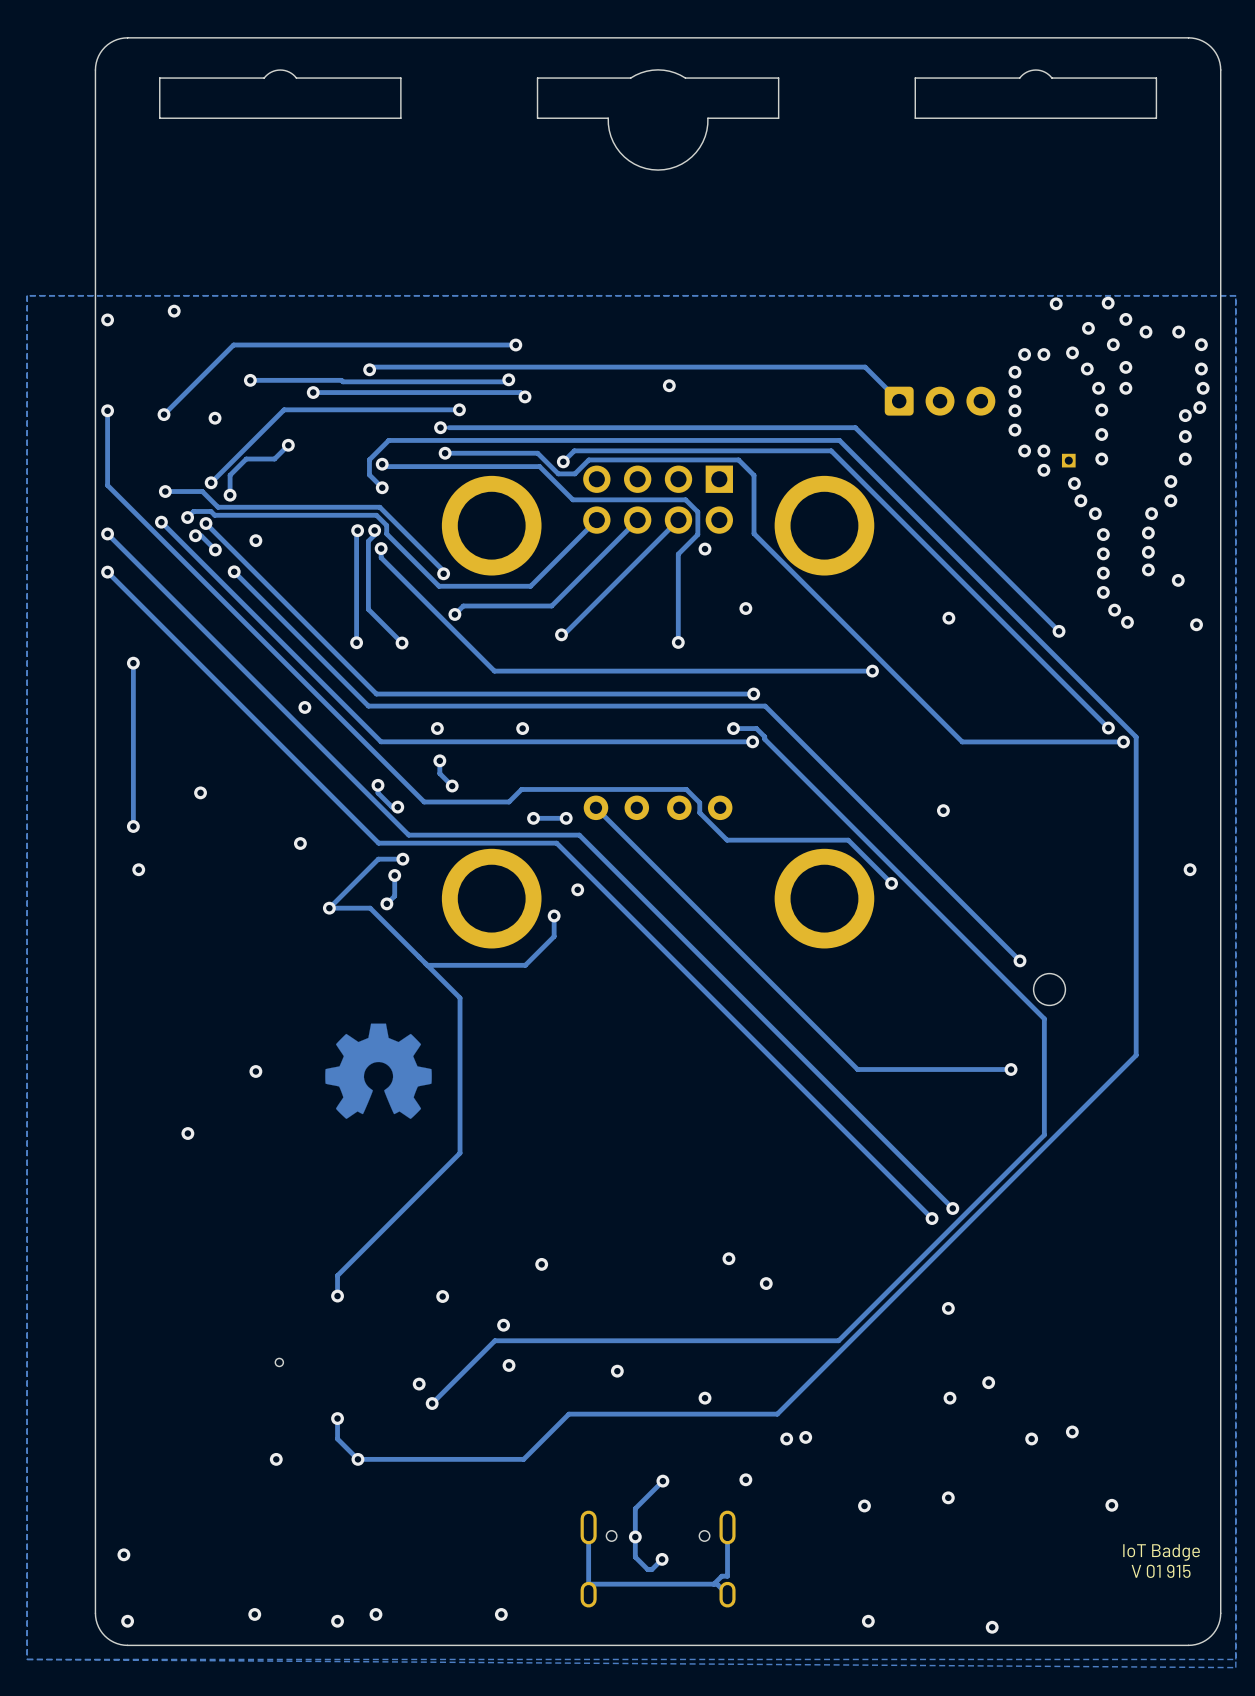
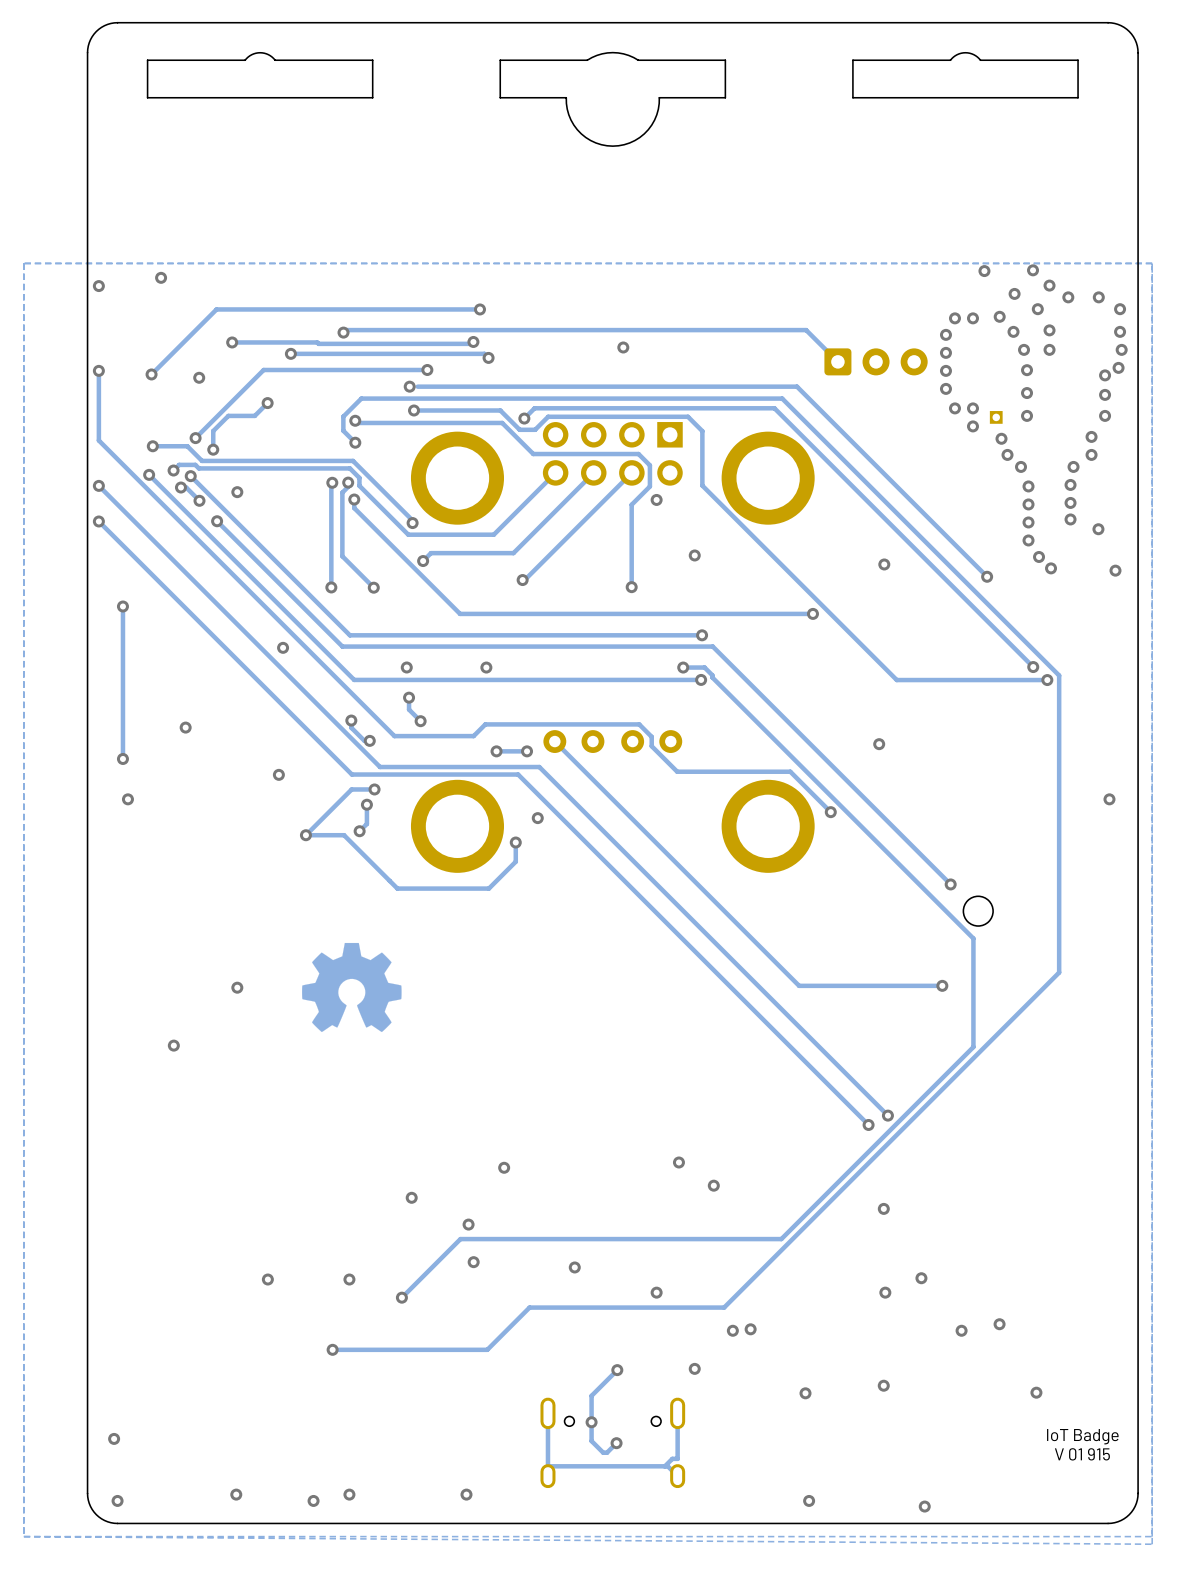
track: (427, 965) (460, 997) (460, 1153) (337, 1275) (337, 1296) -> none
via: (337, 1296) -> none
part: (279, 1362) -> none
via: none -> (267, 1279)
via: none -> (349, 1279)
via: (419, 1384) -> none
track: (337, 1418) (337, 1438) (357, 1459) -> none
via: (337, 1418) -> none
via: (276, 1459) -> none

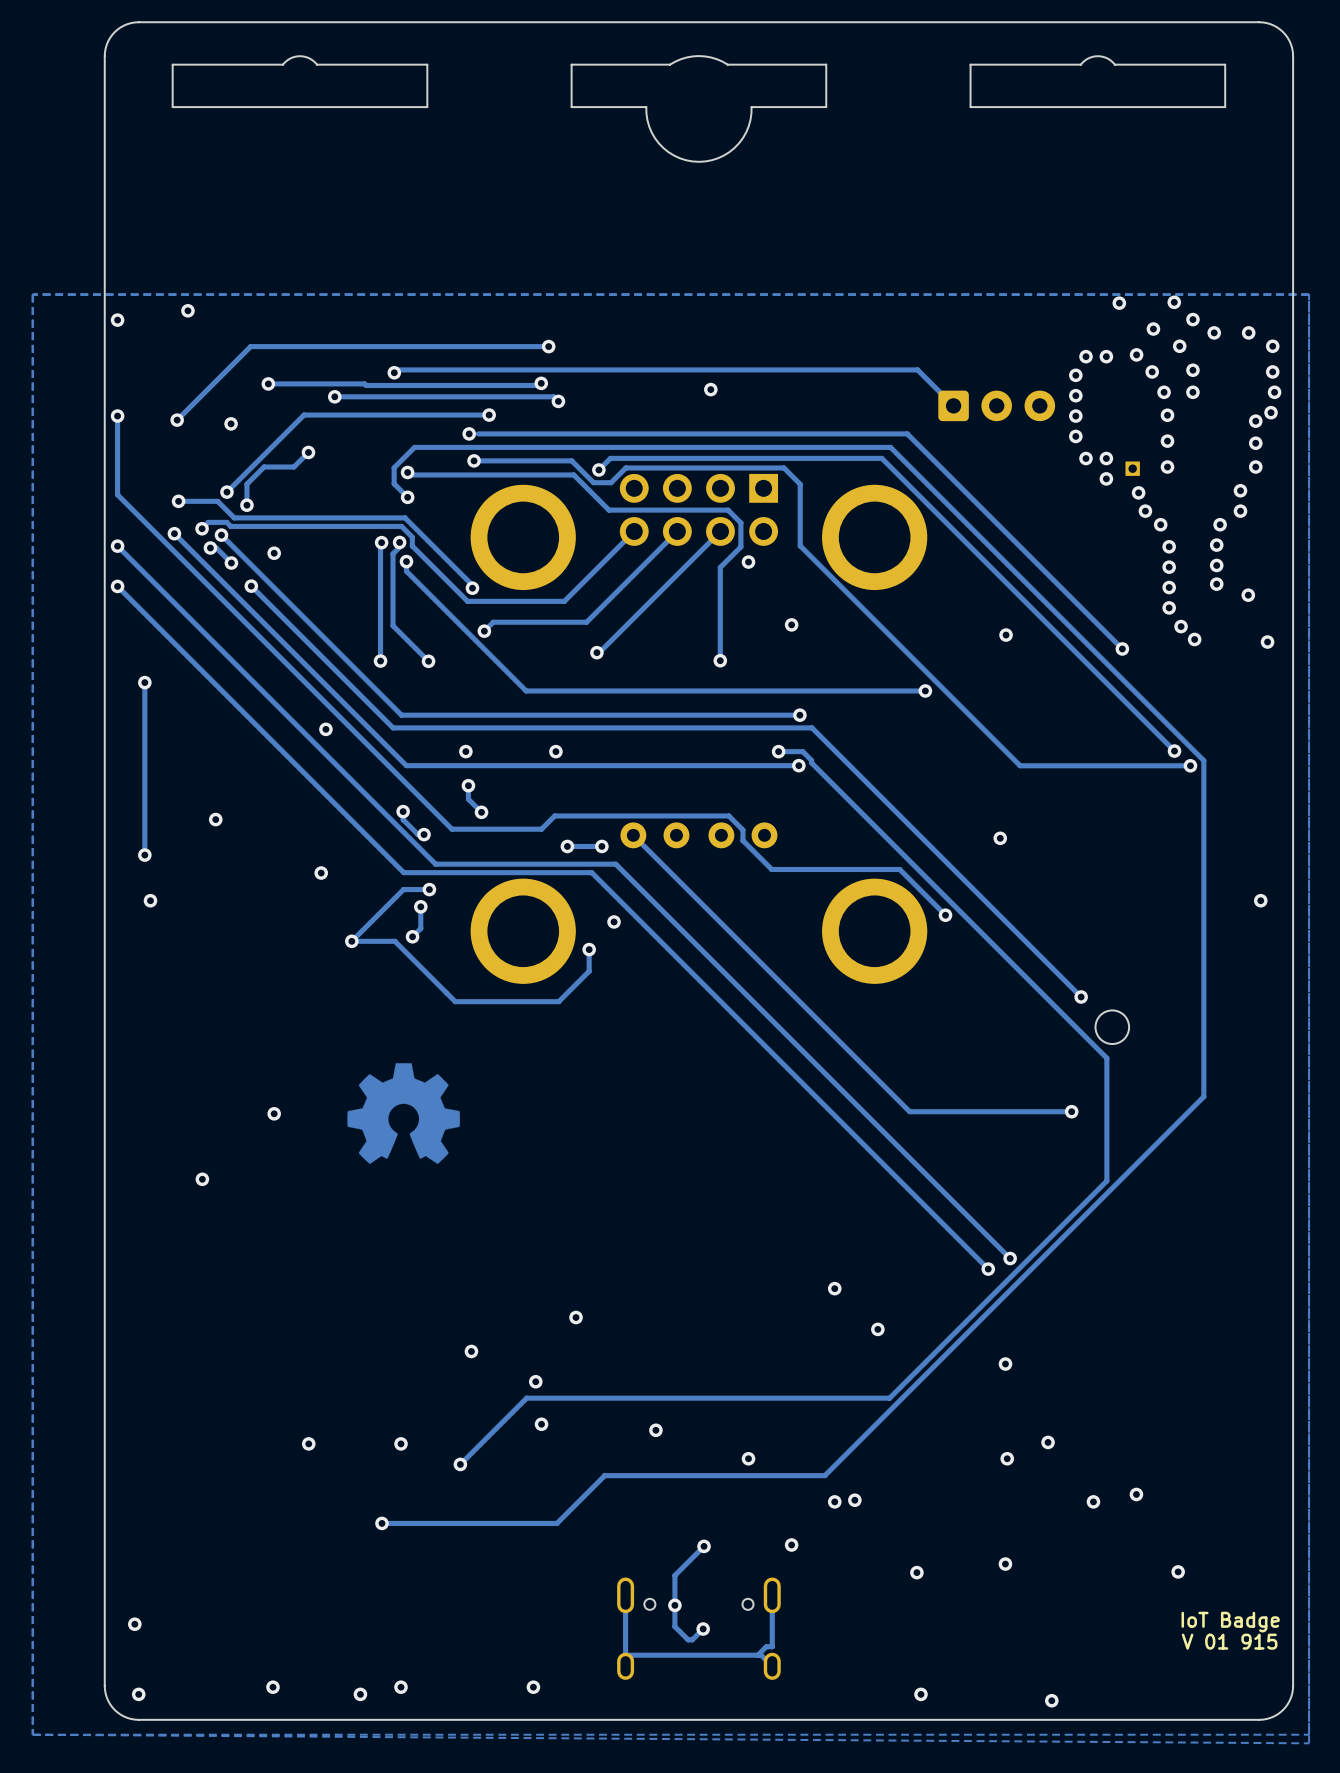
via: none -> (834, 1288)
via: (678, 1162) -> none
via: none -> (877, 1329)
via: (713, 1185) -> none

